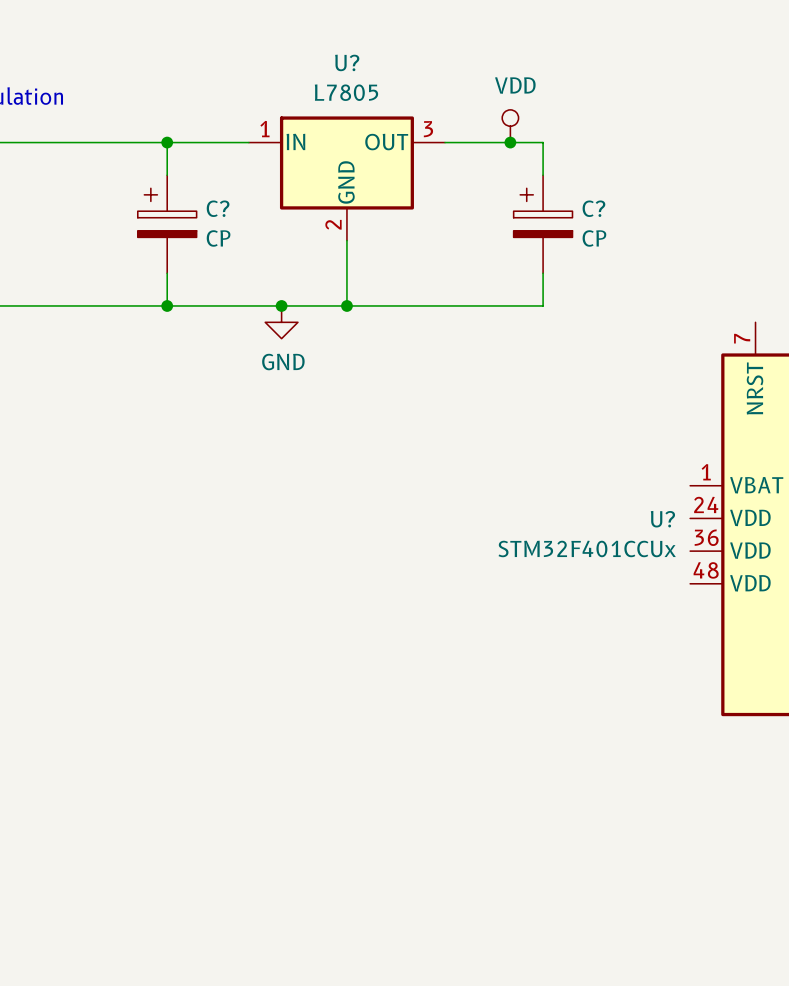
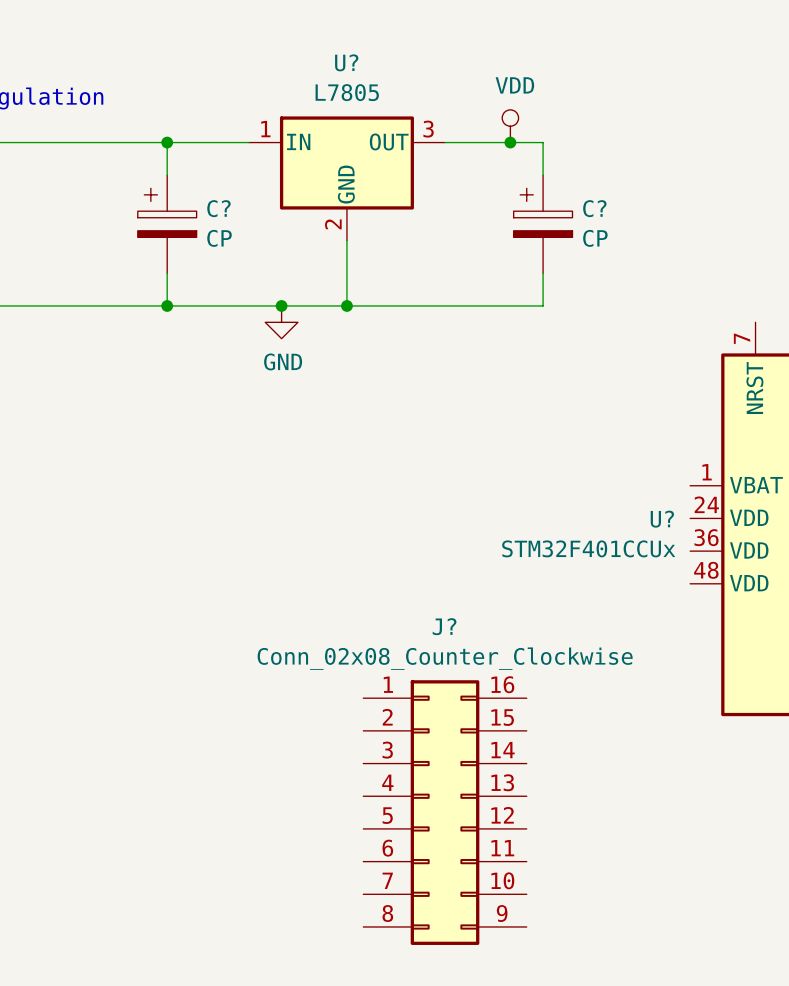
J?: none -> Conn_02x08_Counter_Clockwise (445, 812)

